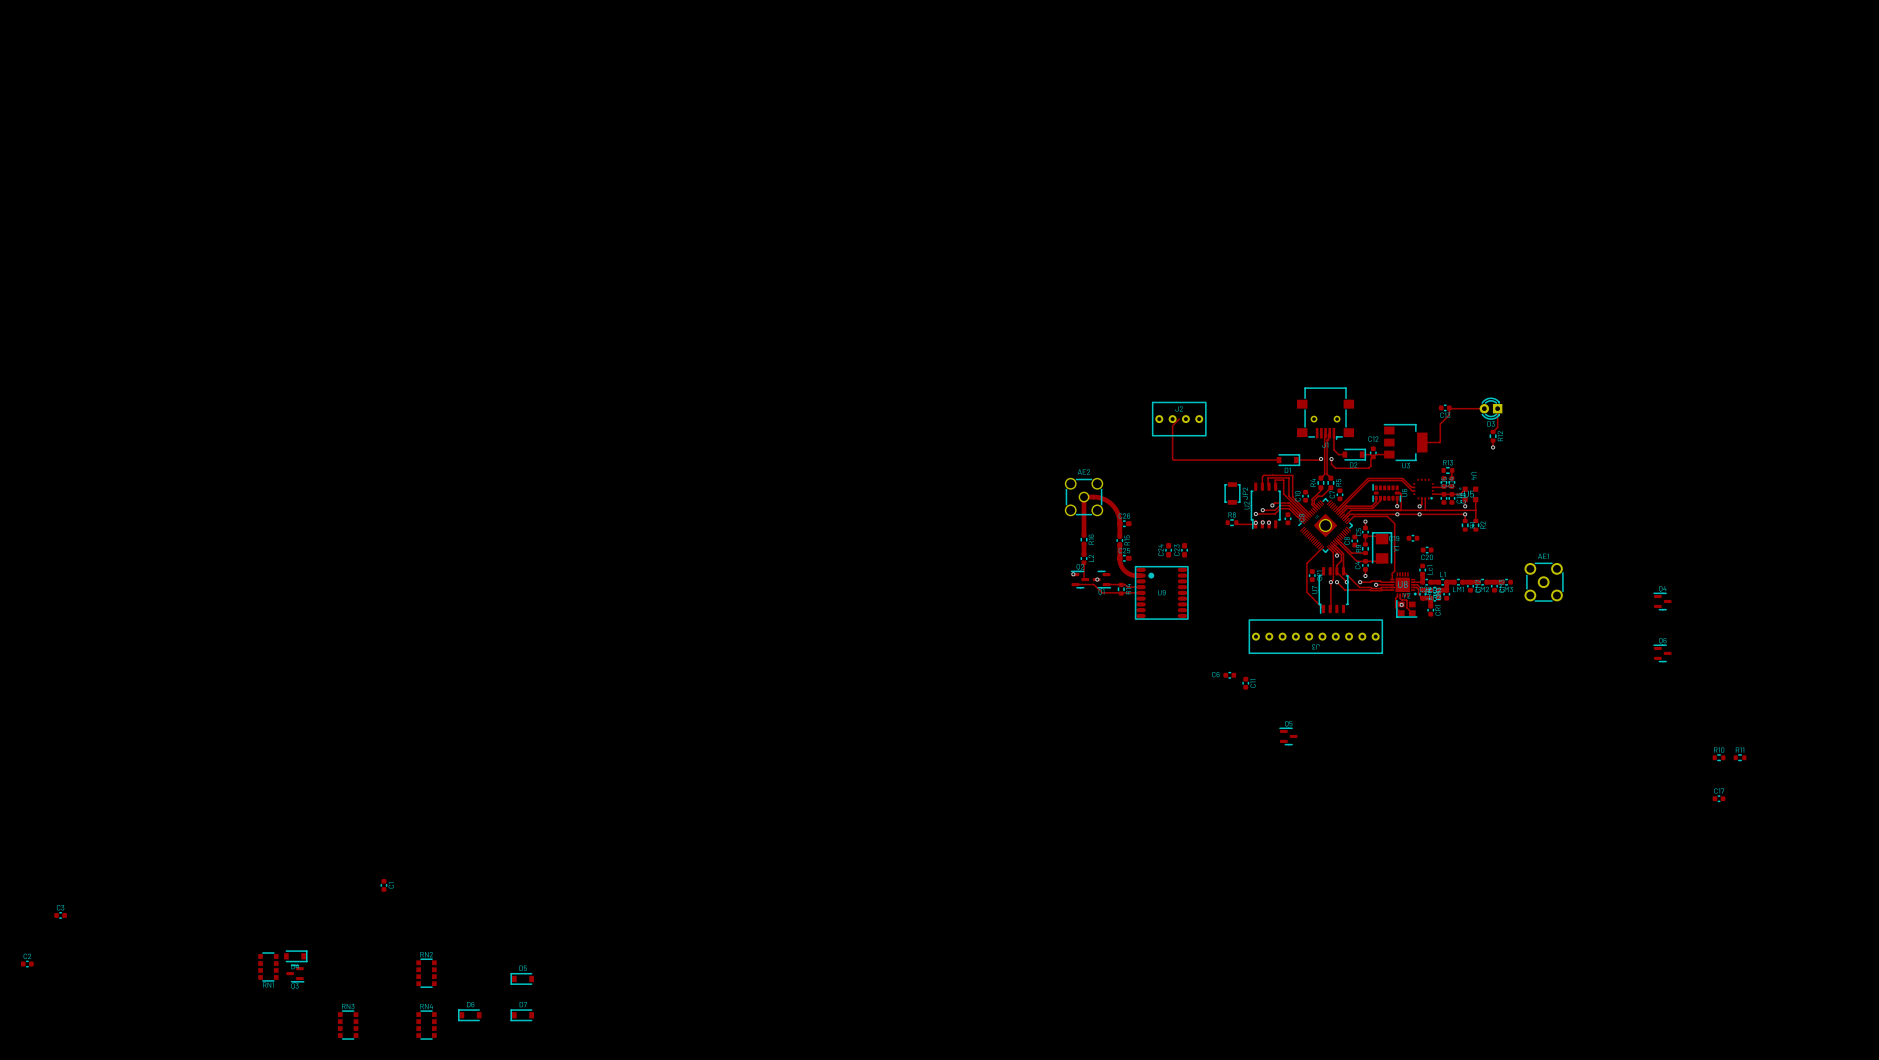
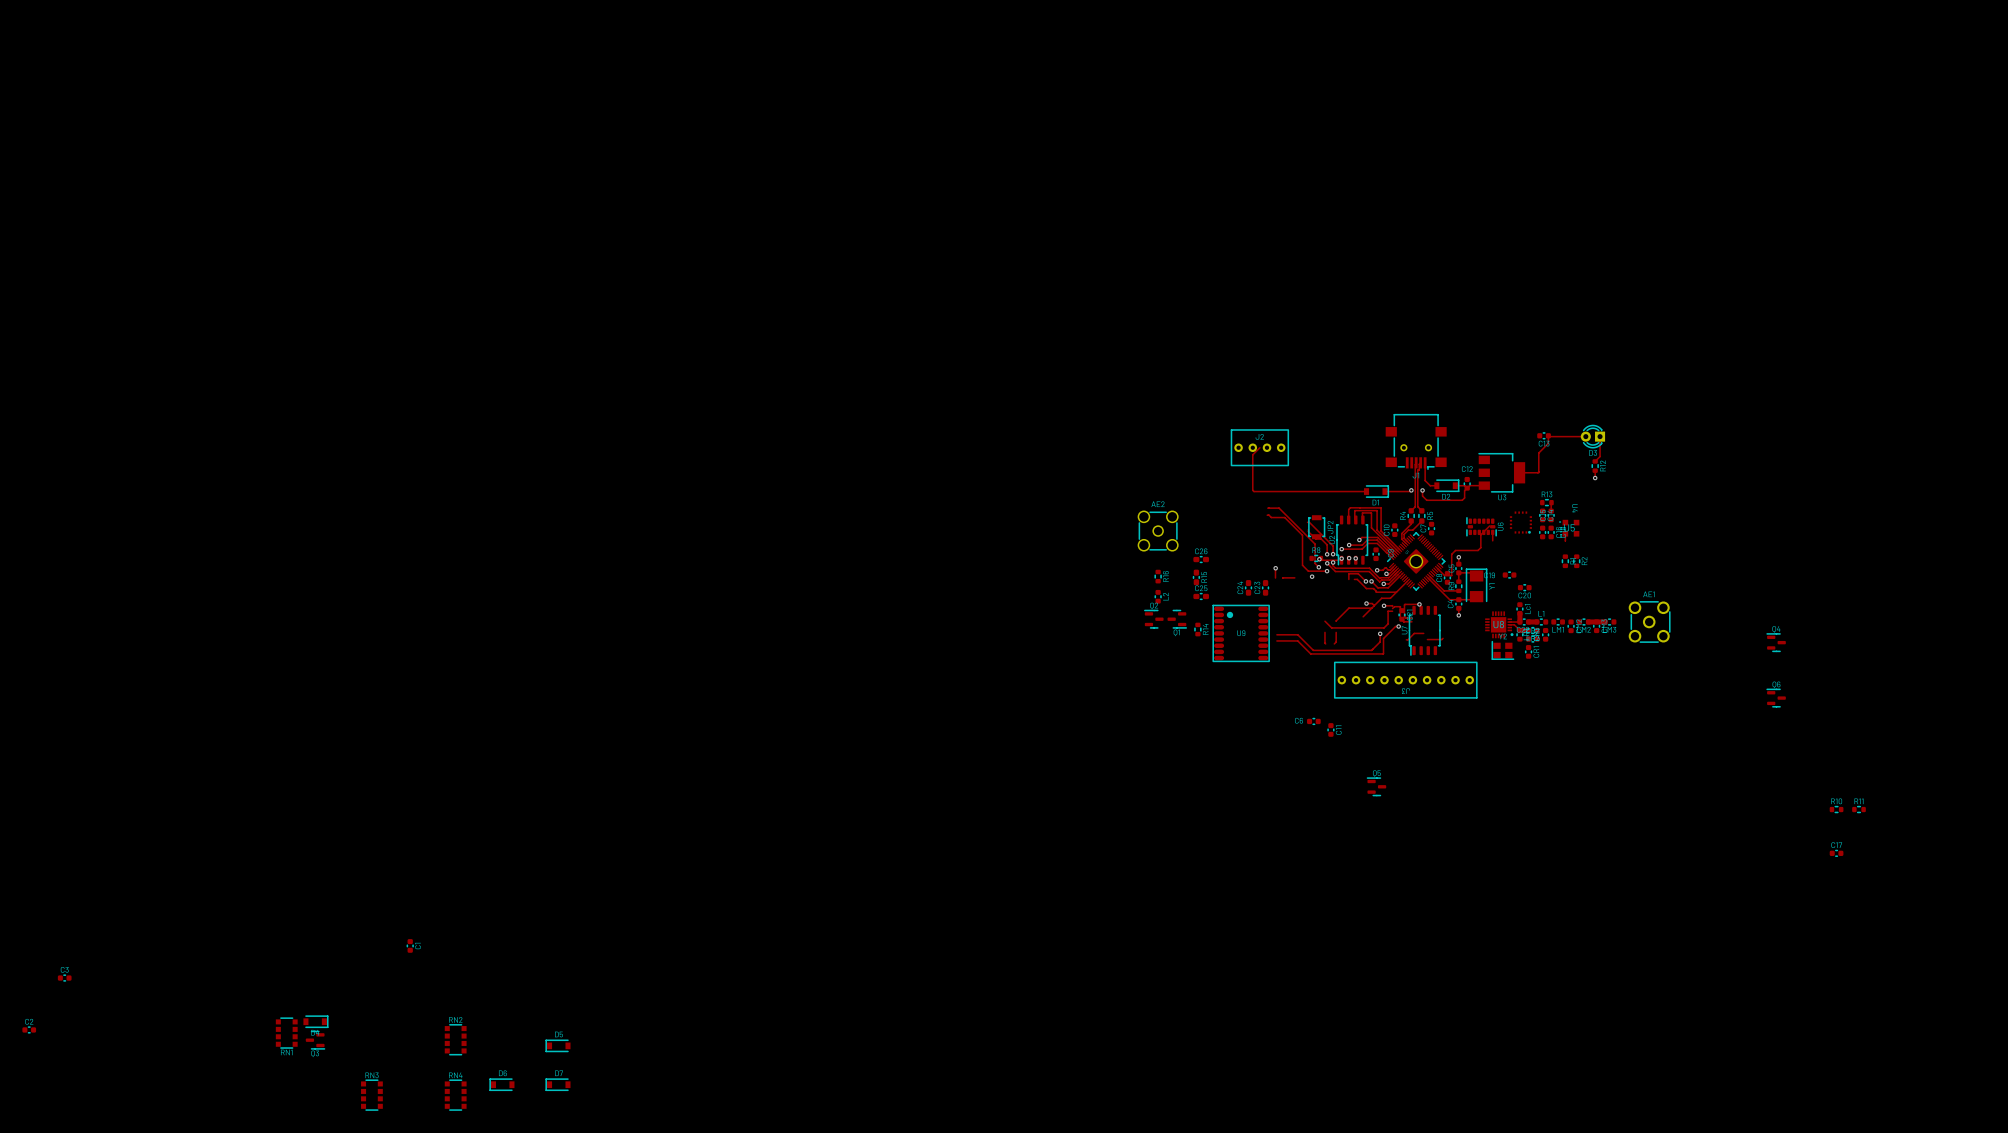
track: none -> (1268, 508) (1279, 508) (1315, 544) (1315, 563) (1318, 567)
track: none -> (1267, 515) (1271, 517) (1284, 517) (1302, 535) (1302, 565) (1308, 571) (1327, 571)
track: (1451, 486) (1432, 487) -> none
track: (1414, 487) (1411, 487) (1402, 478) (1368, 478) (1336, 509) -> none
track: none -> (1307, 522) (1333, 546) (1333, 554)
track: (1465, 489) (1460, 494) (1432, 494) -> none
track: (1414, 490) (1401, 480) (1369, 480) (1338, 511) -> none
track: none -> (1489, 525) (1480, 534) (1480, 547) (1478, 550) (1455, 550) (1451, 554) (1451, 575) (1444, 575)
track: (1397, 493) (1401, 494) (1400, 510) -> none
track: none -> (1308, 529) (1315, 539) (1321, 539) (1327, 544) (1327, 554)
track: (1376, 498) (1376, 501) (1372, 506) (1346, 506) (1339, 512) -> none
track: (1380, 498) (1372, 508) (1347, 508) (1341, 514) -> none
track: (1421, 498) (1421, 504) (1419, 506) -> none
track: (1425, 498) (1425, 510) -> none
track: (1475, 499) (1475, 510) -> none
via: (1397, 506) -> none
via: (1419, 506) -> none
via: (1465, 506) -> none
track: (1475, 510) (1351, 510) (1344, 517) -> none
track: (1475, 510) (1475, 521) -> none
via: (1397, 514) -> none
via: (1419, 514) -> none
via: (1465, 514) -> none
via: none -> (1327, 554)
via: none -> (1333, 554)
track: (1345, 518) (1350, 514) (1465, 514) (1465, 521) -> none
track: (1348, 521) (1353, 516) (1387, 516) (1394, 523) (1394, 571) (1392, 573) (1392, 579) -> none
track: (1119, 523) (1117, 511) (1109, 502) (1099, 497) (1084, 497) (1084, 535) -> none
track: (1119, 523) (1119, 535) -> none
via: none -> (1319, 559)
track: none -> (1333, 562) (1335, 568) (1369, 568) (1379, 578) (1388, 577) (1396, 570)
via: none -> (1333, 562)
track: none -> (1327, 563) (1335, 571) (1369, 571) (1379, 581) (1381, 580) (1389, 580) (1398, 571)
via: none -> (1327, 563)
via: none -> (1318, 567)
track: none -> (1393, 566) (1389, 570) (1385, 567) (1382, 570) (1377, 570)
track: none -> (1275, 568) (1275, 578)
via: none -> (1275, 568)
track: none -> (1394, 569) (1388, 575)
track: none -> (1437, 568) (1444, 575)
via: none -> (1377, 570)
via: none -> (1327, 571)
track: none -> (1348, 573) (1358, 573) (1365, 581)
track: none -> (1348, 573) (1348, 579)
via: none -> (1386, 573)
track: none -> (1398, 574) (1388, 583) (1383, 583)
via: none -> (1312, 576)
track: none -> (1400, 575) (1388, 587) (1377, 587) (1371, 581)
track: none -> (1294, 577) (1282, 578)
track: none -> (1354, 579) (1357, 579) (1366, 588) (1373, 588) (1376, 592) (1396, 592)
track: (1084, 544) (1084, 554) -> none
via: none -> (1365, 581)
via: none -> (1371, 581)
track: none -> (1407, 581) (1390, 598) (1381, 598) (1363, 616)
track: (1333, 544) (1343, 553) (1343, 571) (1359, 587) (1386, 587) -> none
track: (1119, 545) (1119, 560) (1122, 567) (1129, 573) (1141, 575) -> none
track: (1332, 545) (1341, 554) (1341, 560) (1336, 565) (1336, 572) (1346, 582) -> none
via: none -> (1383, 583)
track: (1330, 546) (1337, 555) -> none
track: (1321, 548) (1306, 563) (1306, 592) (1323, 609) -> none
track: (1329, 548) (1333, 552) (1333, 579) (1330, 582) (1330, 609) -> none
via: (1337, 555) -> none
track: (1084, 562) (1085, 579) -> none
track: none -> (1366, 603) (1374, 605)
via: none -> (1366, 603)
track: none -> (1419, 604) (1404, 604) (1404, 616) (1411, 618)
via: none -> (1419, 604)
track: none -> (1392, 605) (1384, 605)
via: none -> (1384, 605)
track: none -> (1371, 608) (1348, 608) (1336, 621)
track: none -> (1392, 608) (1400, 606) (1400, 618) (1403, 621)
track: none -> (1392, 611) (1388, 611) (1388, 623) (1384, 627) (1331, 627) (1324, 621)
via: (1073, 574) -> none
via: (1097, 579) -> none
track: none -> (1403, 621) (1411, 621)
via: (1330, 582) -> none
track: (1337, 582) (1344, 590) (1392, 590) -> none
via: (1337, 582) -> none
via: (1346, 582) -> none
track: (1360, 582) (1393, 582) -> none
via: (1360, 582) -> none
track: (1454, 582) (1446, 582) (1446, 590) (1438, 590) (1438, 598) -> none
track: (1462, 582) (1478, 582) -> none
track: (1075, 584) (1093, 584) (1102, 592) (1141, 592) -> none
track: (1106, 584) (1141, 587) -> none
track: (1376, 584) (1392, 584) -> none
via: (1376, 584) -> none
track: none -> (1398, 626) (1395, 626) (1383, 638) (1383, 653) (1310, 653) (1297, 640) (1276, 640)
via: none -> (1398, 626)
track: (1386, 587) (1393, 587) -> none
track: (1413, 587) (1418, 589) (1418, 594) (1422, 598) (1430, 598) (1430, 606) -> none
track: none -> (1324, 632) (1325, 643)
track: none -> (1336, 632) (1336, 642) (1334, 643)
track: none -> (1423, 633) (1414, 633) (1406, 639)
track: none -> (1380, 633) (1380, 641) (1371, 650) (1313, 650) (1297, 634) (1276, 634)
via: none -> (1380, 633)
track: (1397, 595) (1395, 607) (1401, 613) -> none
track: (1400, 595) (1401, 600) (1406, 600) (1406, 607) (1412, 613) -> none
track: none -> (1443, 638) (1427, 639)
via: (1401, 604) -> none

